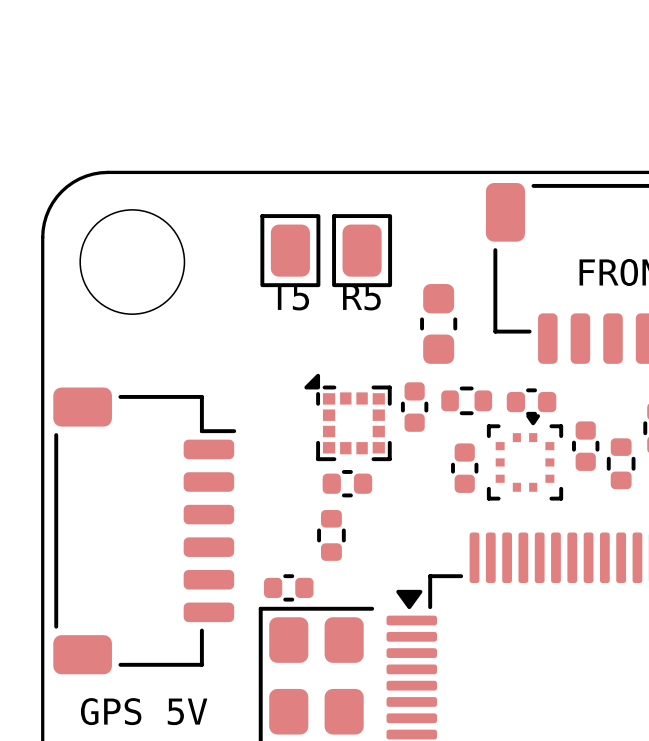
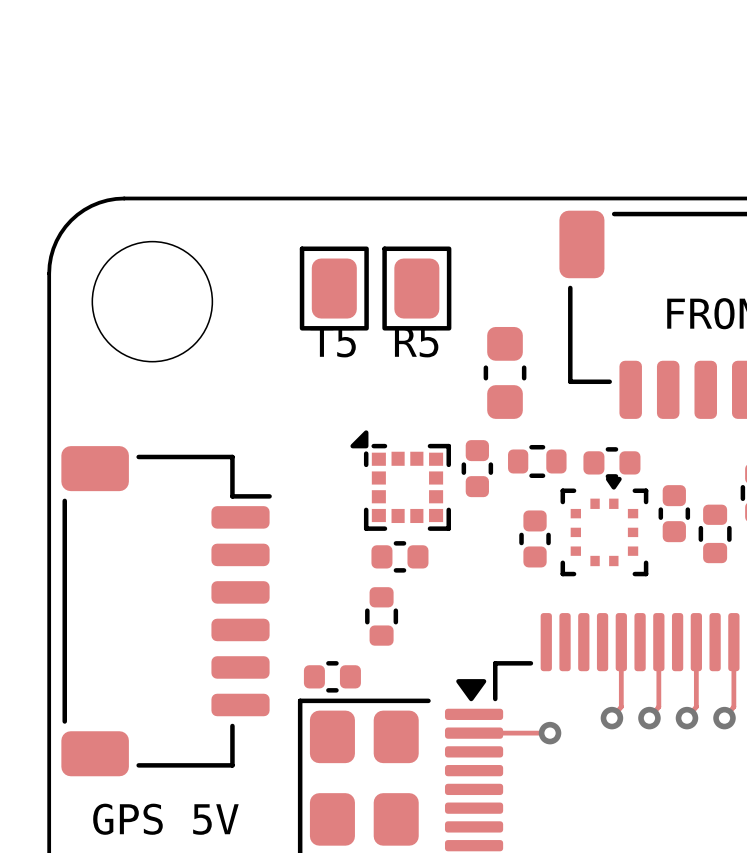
track: none -> (621, 642) (621, 706) (611, 718)
track: none -> (658, 642) (658, 706) (649, 718)
track: none -> (696, 642) (696, 706) (686, 718)
track: none -> (733, 642) (733, 706) (724, 718)
via: none -> (611, 718)
via: none -> (649, 718)
via: none -> (686, 718)
via: none -> (724, 718)
track: none -> (474, 733) (550, 733)
via: none -> (550, 733)

